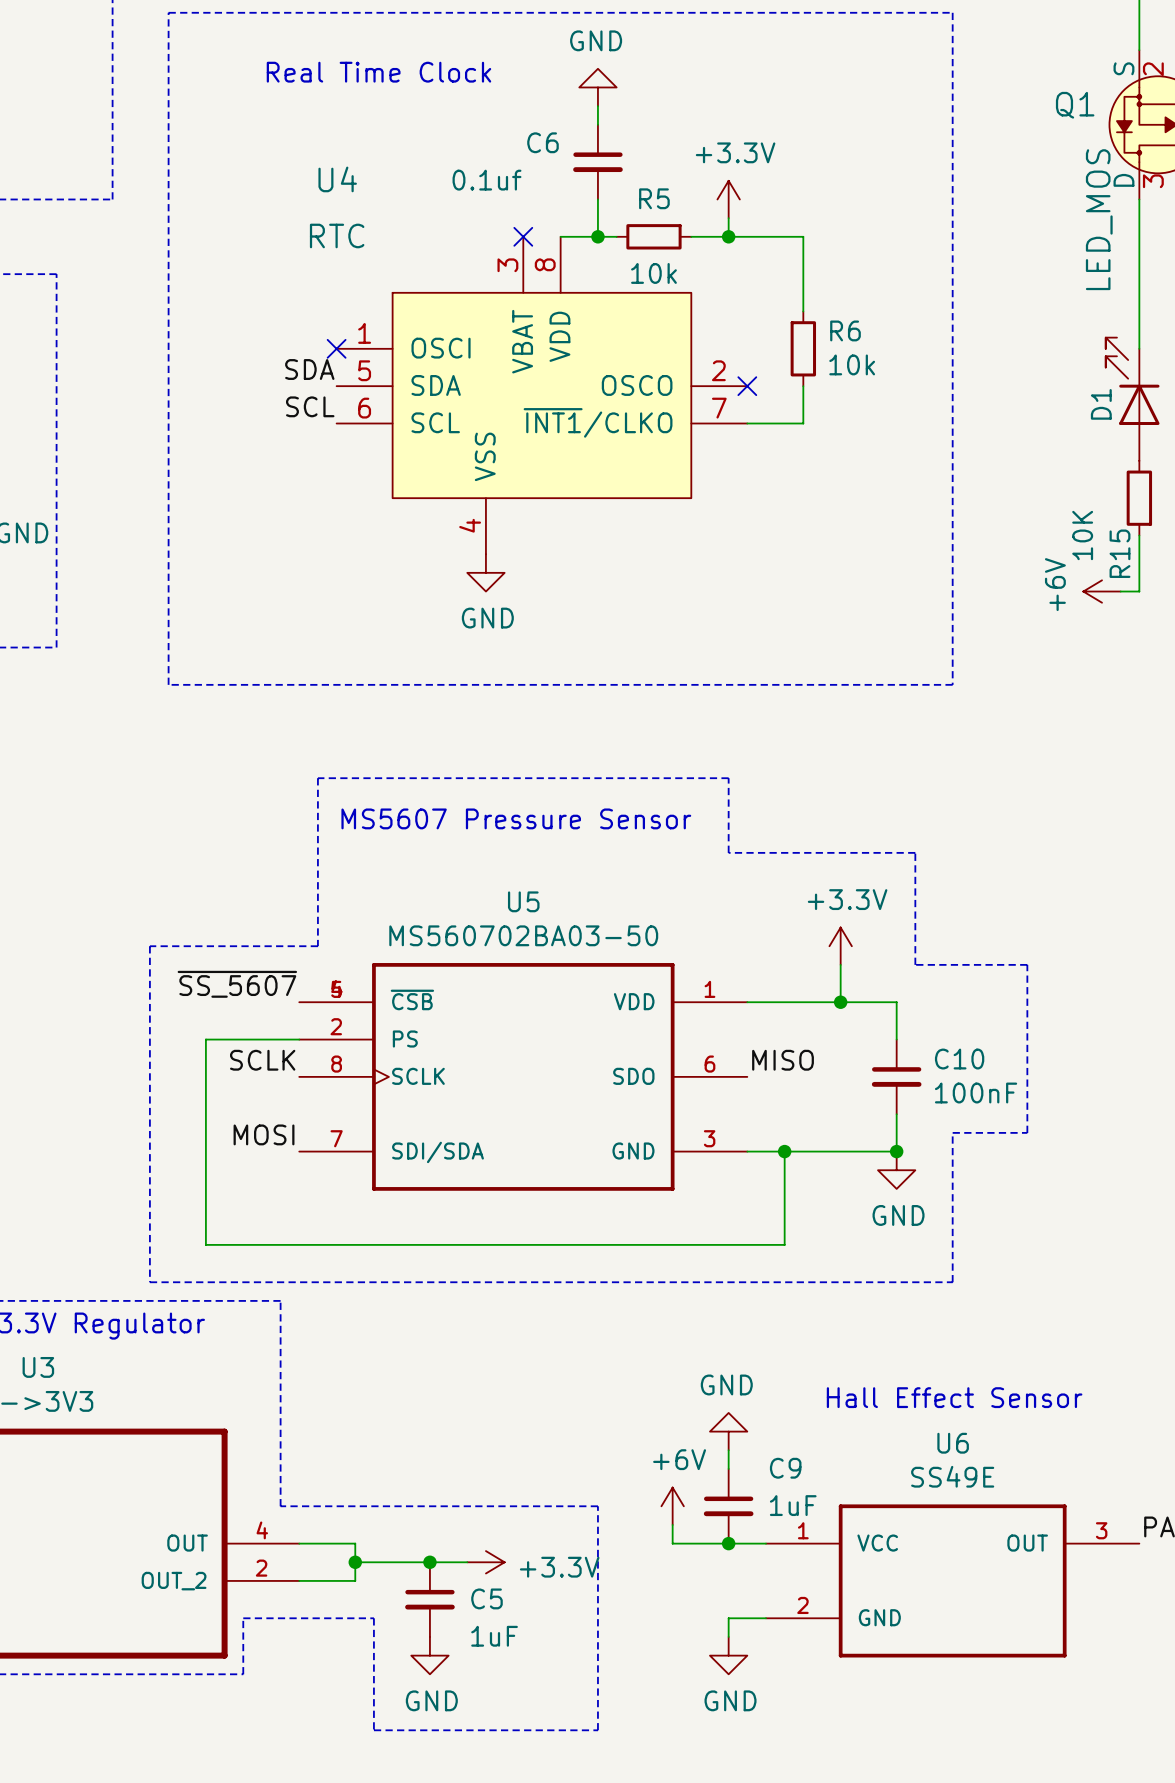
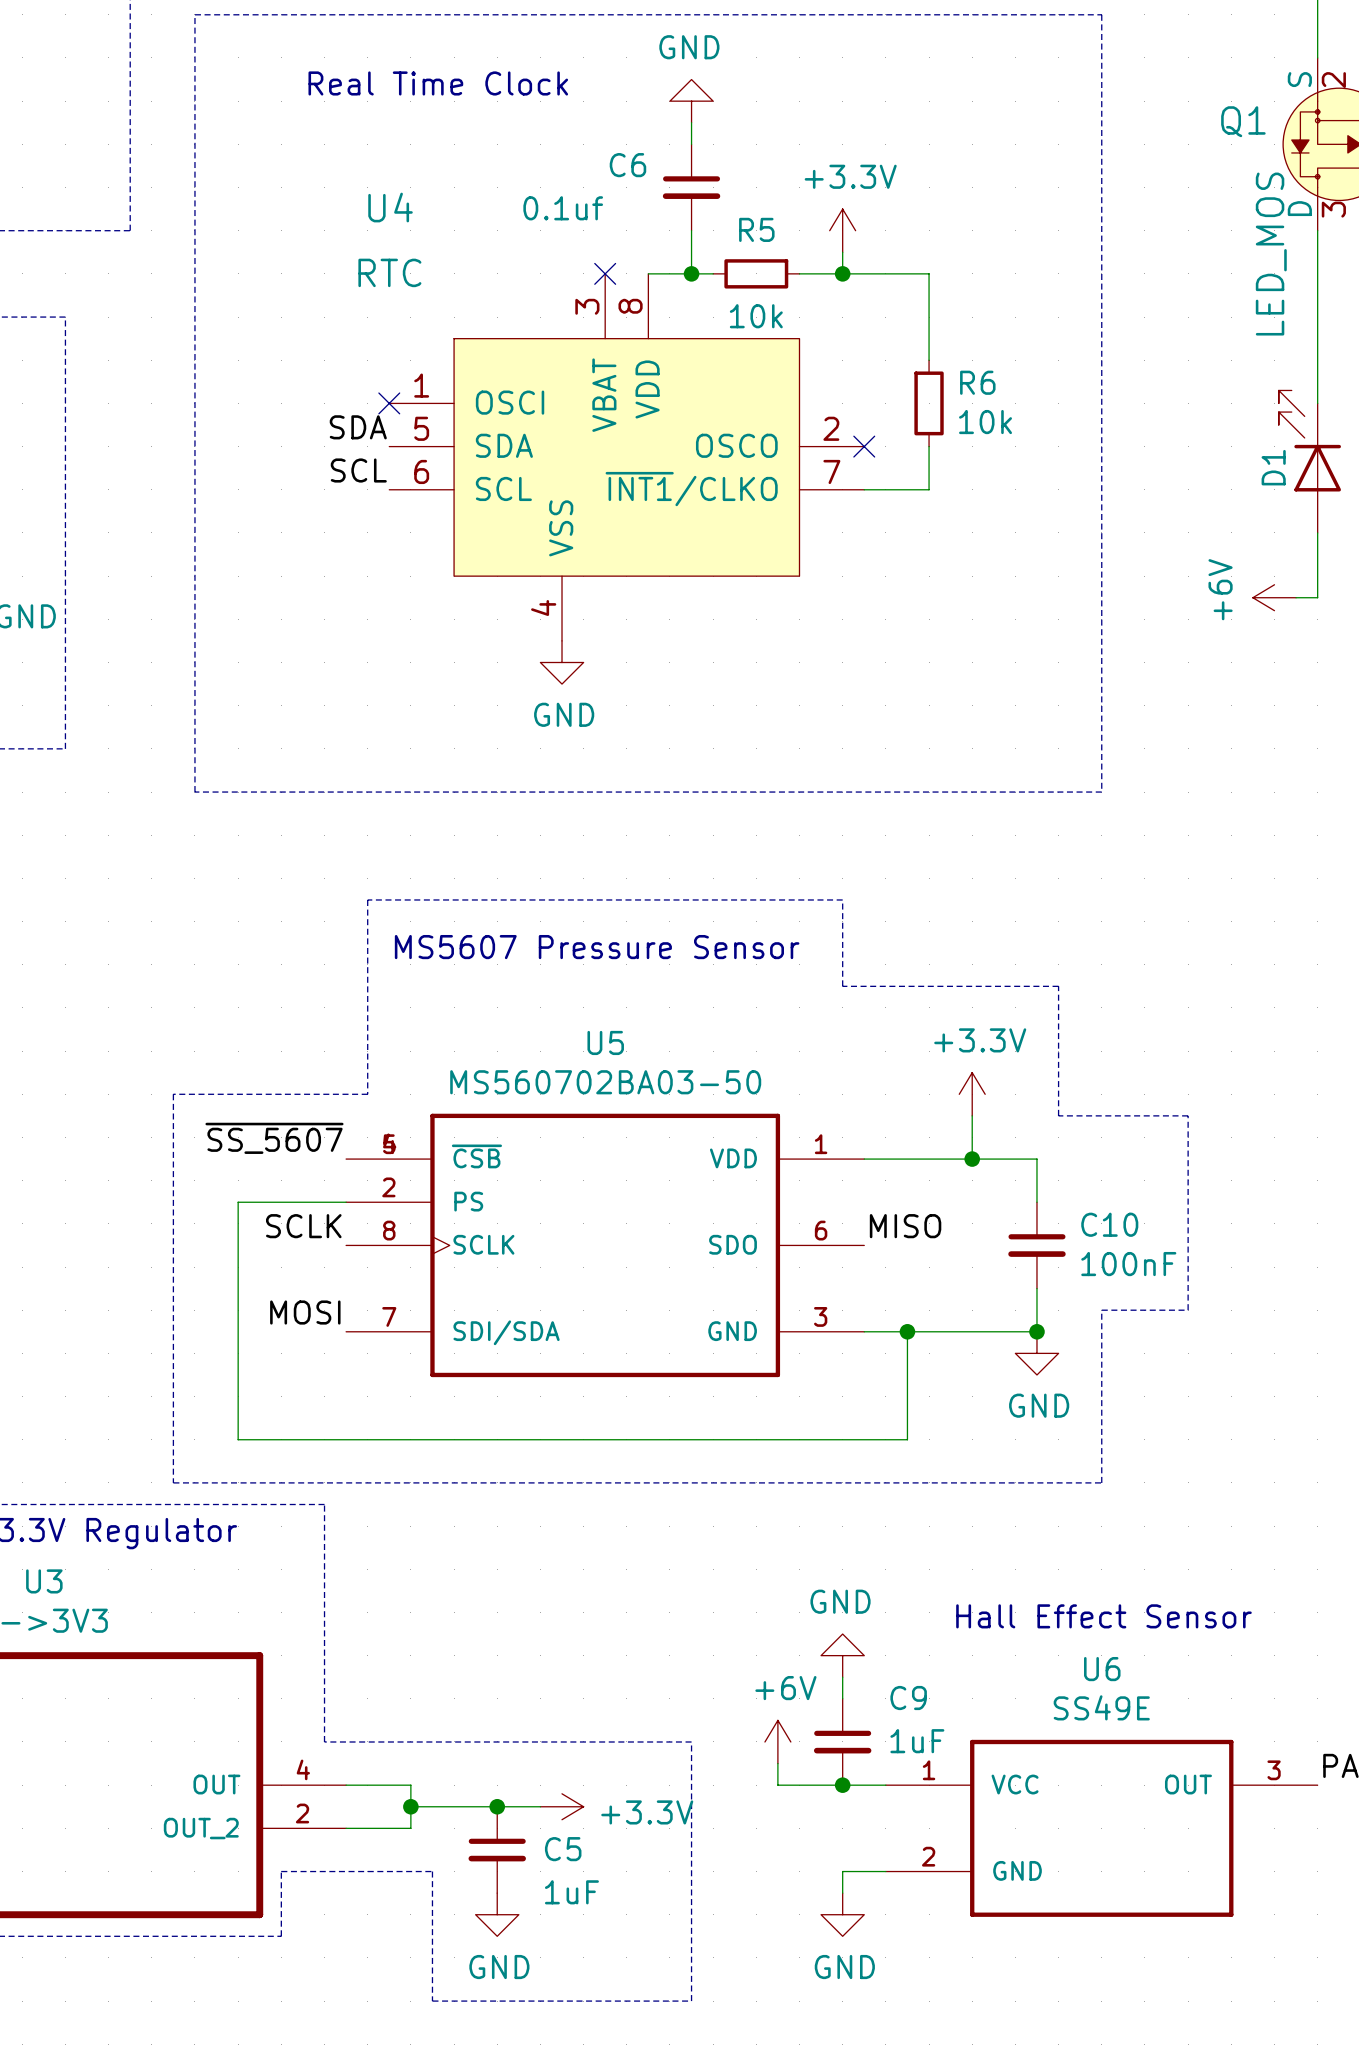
R15: 10K (1139, 498) -> none
wire: (1139, 535) (1139, 591) (1120, 591) -> (1317, 532) (1317, 597) (1296, 597)
power symbol position: +6V (1102, 591) -> +6V (1274, 597)

